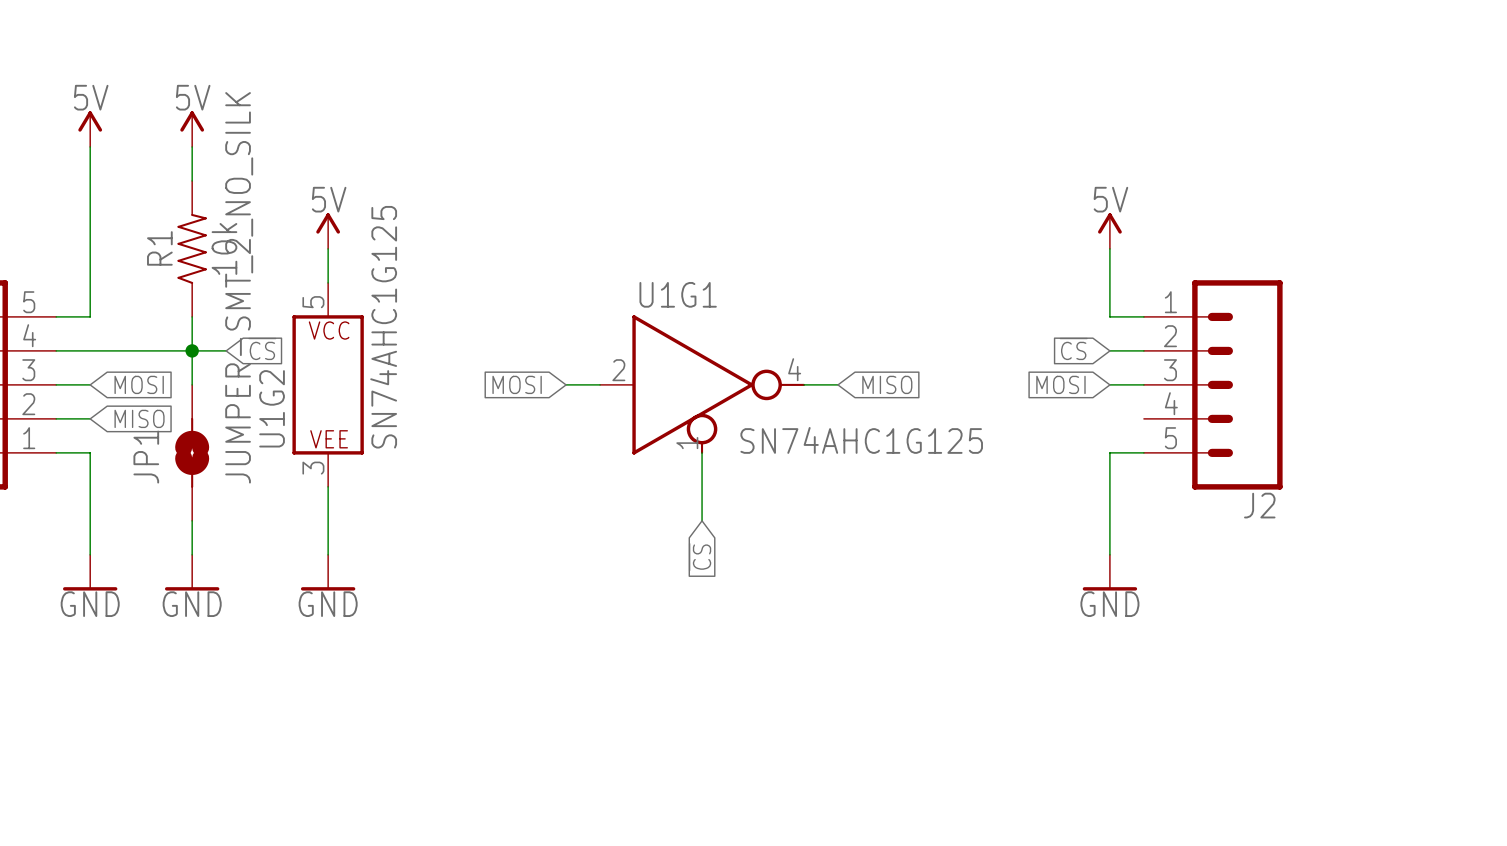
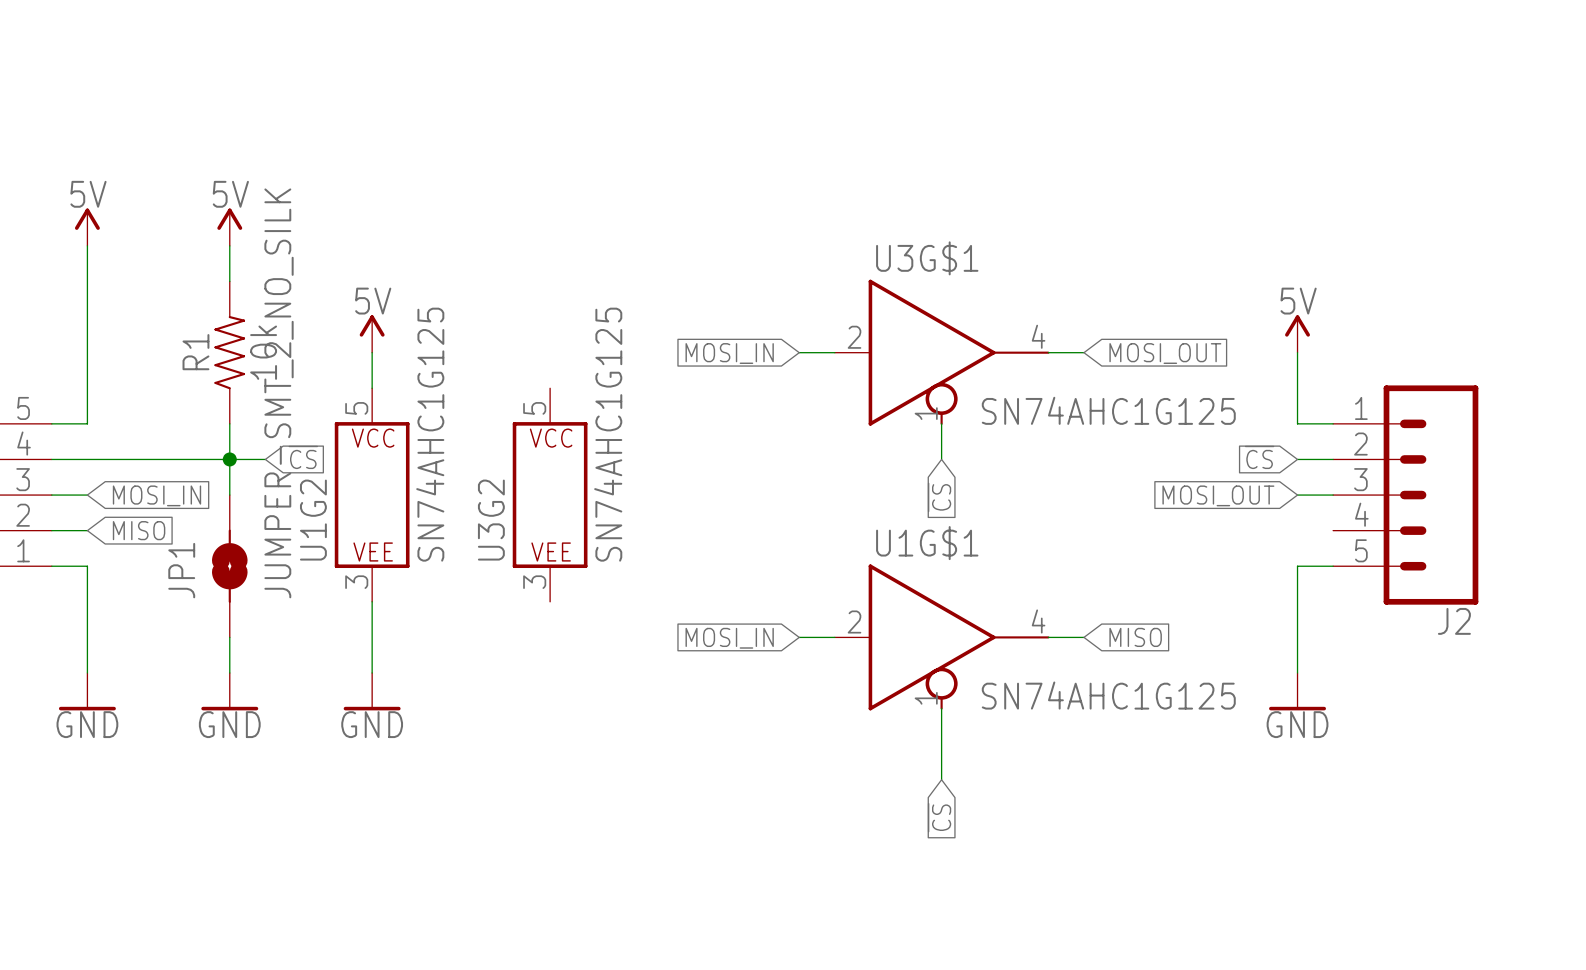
power symbol position: 5V (192, 129) -> 5V (229, 227)
wire: (192, 146) (192, 180) -> (229, 245) (229, 281)
power symbol position: 5V (328, 231) -> 5V (372, 333)
power symbol position: 5V (1109, 231) -> 5V (1297, 333)
R1 position: (192, 248) -> (229, 352)
wire: (328, 248) (328, 282) -> (372, 352) (372, 388)
wire: none -> (799, 352) (834, 352)
U3G$1: none -> SN74AHC1G125 (942, 352)
wire: none -> (1048, 352) (1083, 352)
wire: (1109, 248) (1109, 316) (1143, 316) -> (1297, 352) (1297, 423) (1333, 423)
global label: none -> MOSI_IN (729, 353)
global label: none -> MOSI_OUT (1165, 353)
wire: (192, 316) (192, 384) -> (229, 423) (229, 495)
wire: none -> (941, 423) (941, 459)
global label position: ~{CS} (262, 348) -> ~{CS} (303, 457)
global label: ~{CS} (1073, 348) -> none
global label: none -> ~{CS} (1259, 457)
junction position: (192, 350) -> (229, 459)
wire: none -> (229, 459) (265, 459)
wire: (1109, 350) (1143, 350) -> (1297, 459) (1333, 459)
global label: MOSI (139, 384) -> MOSI_IN (156, 495)
U1G2 position: (328, 384) -> (372, 495)
global label: MOSI (517, 384) -> none
U3G2: none -> SN74AHC1G125 (550, 495)
wire: (566, 384) (600, 384) -> (799, 637) (834, 637)
U1G1: SN74AHC1G125 (702, 384) -> none
wire: (804, 384) (838, 384) -> (1048, 637) (1083, 637)
global label position: MISO (887, 384) -> MISO (1135, 637)
global label: MOSI (1060, 384) -> MOSI_OUT (1218, 495)
wire: (1109, 384) (1143, 384) -> (1297, 495) (1333, 495)
J2 position: (1213, 384) -> (1405, 495)
global label: none -> ~{CS} (939, 497)
JP1 position: (192, 452) -> (229, 566)
wire: (702, 452) (702, 520) -> (941, 708) (941, 779)
wire: (1143, 452) (1109, 452) (1109, 554) -> (1333, 566) (1297, 566) (1297, 673)
wire: (328, 486) (328, 554) -> (372, 601) (372, 673)
wire: (192, 520) (192, 554) -> (229, 637) (229, 673)
U1G$1: none -> SN74AHC1G125 (942, 637)
global label: none -> MOSI_IN (729, 638)
global label: ~{CS} (700, 557) -> none
power symbol position: GND (192, 572) -> GND (229, 691)
power symbol position: GND (328, 572) -> GND (372, 691)
power symbol position: GND (1109, 572) -> GND (1297, 691)
global label: none -> ~{CS} (939, 817)

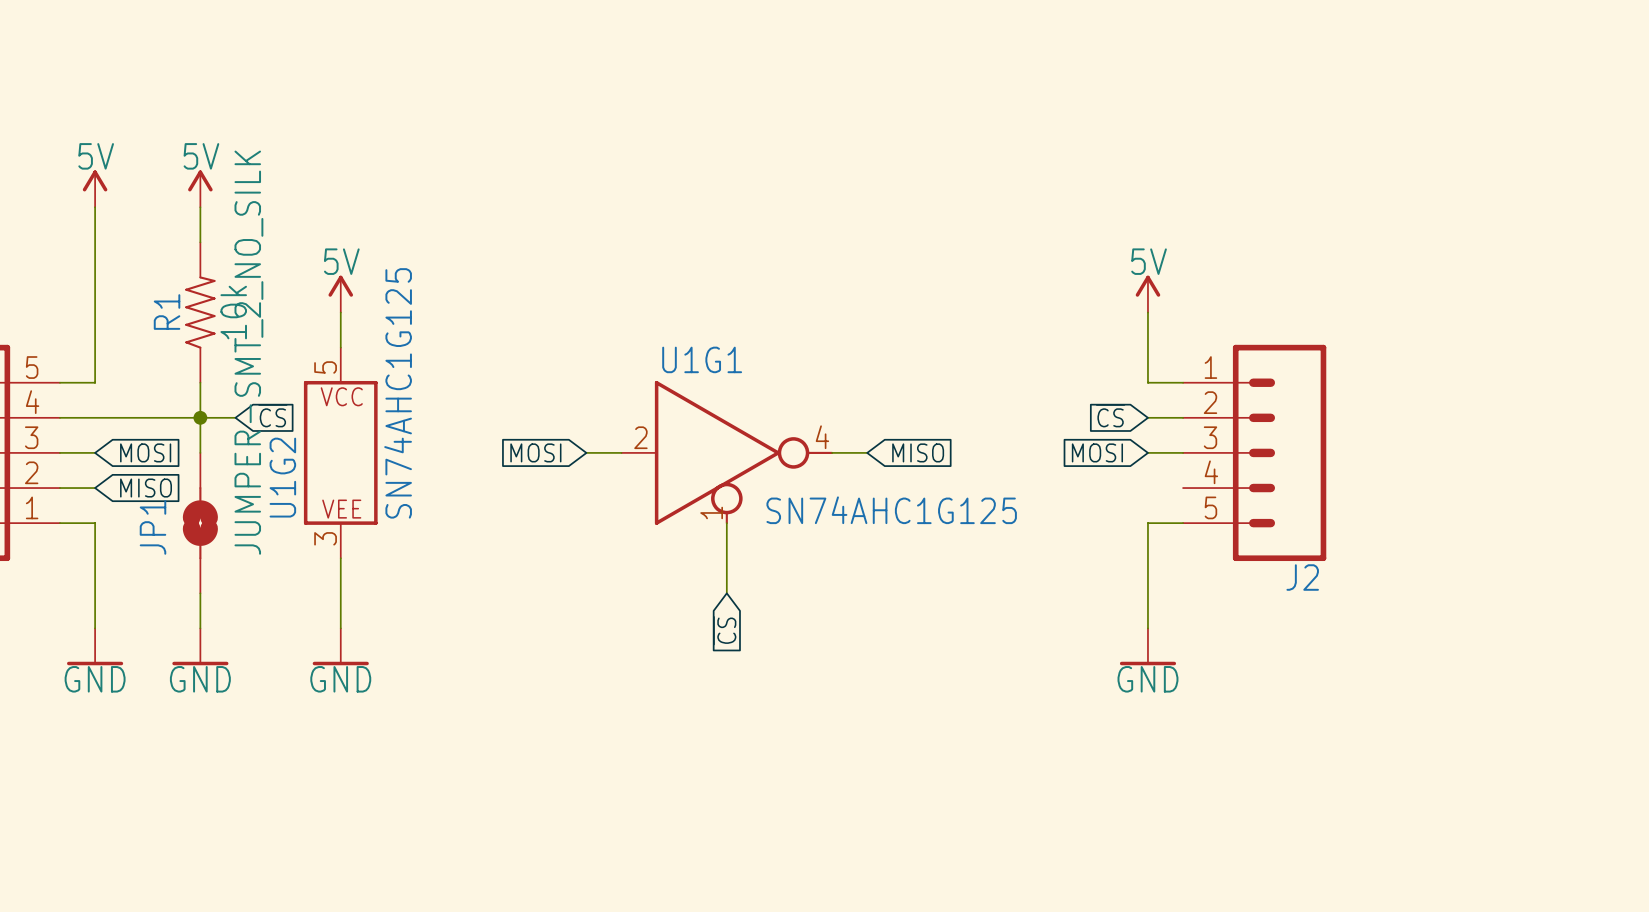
power symbol position: 5V (229, 227) -> 5V (200, 188)
wire: (229, 245) (229, 281) -> (200, 207) (200, 242)
power symbol position: 5V (372, 333) -> 5V (340, 294)
power symbol position: 5V (1297, 333) -> 5V (1147, 294)
R1 position: (229, 352) -> (200, 312)
wire: (372, 352) (372, 388) -> (340, 312) (340, 347)
wire: (799, 352) (834, 352) -> none
U3G$1: SN74AHC1G125 (942, 352) -> none
wire: (1048, 352) (1083, 352) -> none
wire: (1297, 352) (1297, 423) (1333, 423) -> (1147, 312) (1147, 382) (1183, 382)
global label: MOSI_IN (729, 353) -> none
global label: MOSI_OUT (1165, 353) -> none
wire: (229, 423) (229, 495) -> (200, 382) (200, 452)
wire: (941, 423) (941, 459) -> none
global label position: ~{CS} (303, 457) -> ~{CS} (272, 415)
global label: none -> ~{CS} (1110, 415)
global label: ~{CS} (1259, 457) -> none
wire: (229, 459) (265, 459) -> none
junction position: (229, 459) -> (200, 417)
wire: (1297, 459) (1333, 459) -> (1147, 417) (1183, 417)
global label: MOSI_IN (156, 495) -> MOSI (145, 452)
U1G2 position: (372, 495) -> (340, 452)
global label: none -> MOSI (535, 452)
U3G2: SN74AHC1G125 (550, 495) -> none
U1G1: none -> SN74AHC1G125 (727, 452)
global label: MOSI_OUT (1218, 495) -> MOSI (1097, 452)
wire: (1297, 495) (1333, 495) -> (1147, 452) (1183, 452)
J2 position: (1405, 495) -> (1254, 452)
global label: ~{CS} (939, 497) -> none
JP1 position: (229, 566) -> (200, 523)
wire: (1333, 566) (1297, 566) (1297, 673) -> (1183, 523) (1147, 523) (1147, 628)
wire: (372, 601) (372, 673) -> (340, 558) (340, 628)
wire: (229, 637) (229, 673) -> (200, 593) (200, 628)
wire: (799, 637) (834, 637) -> (586, 452) (621, 452)
U1G$1: SN74AHC1G125 (942, 637) -> none
wire: (1048, 637) (1083, 637) -> (832, 452) (867, 452)
global label position: MISO (1135, 637) -> MISO (918, 452)
global label: MOSI_IN (729, 638) -> none
global label: none -> ~{CS} (724, 630)
power symbol position: GND (229, 691) -> GND (200, 646)
power symbol position: GND (372, 691) -> GND (340, 646)
power symbol position: GND (1297, 691) -> GND (1147, 646)
wire: (941, 708) (941, 779) -> (726, 523) (726, 593)
global label: ~{CS} (939, 817) -> none

